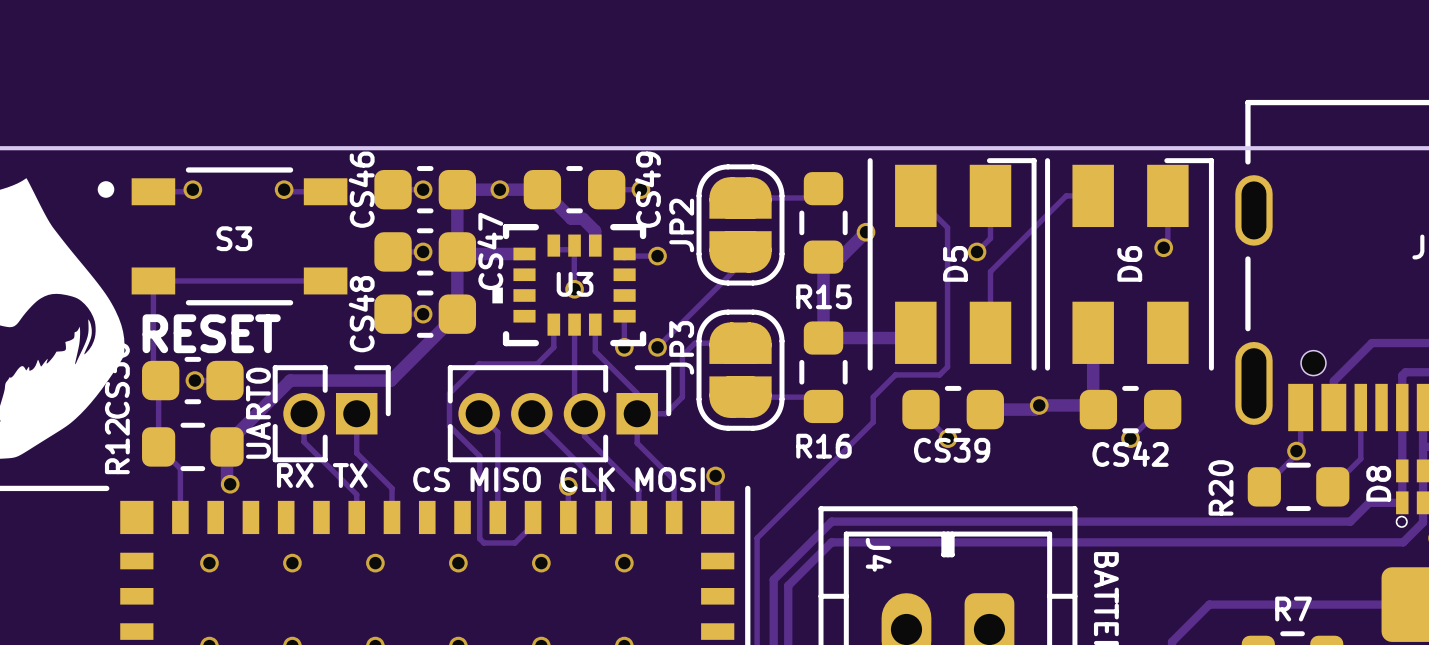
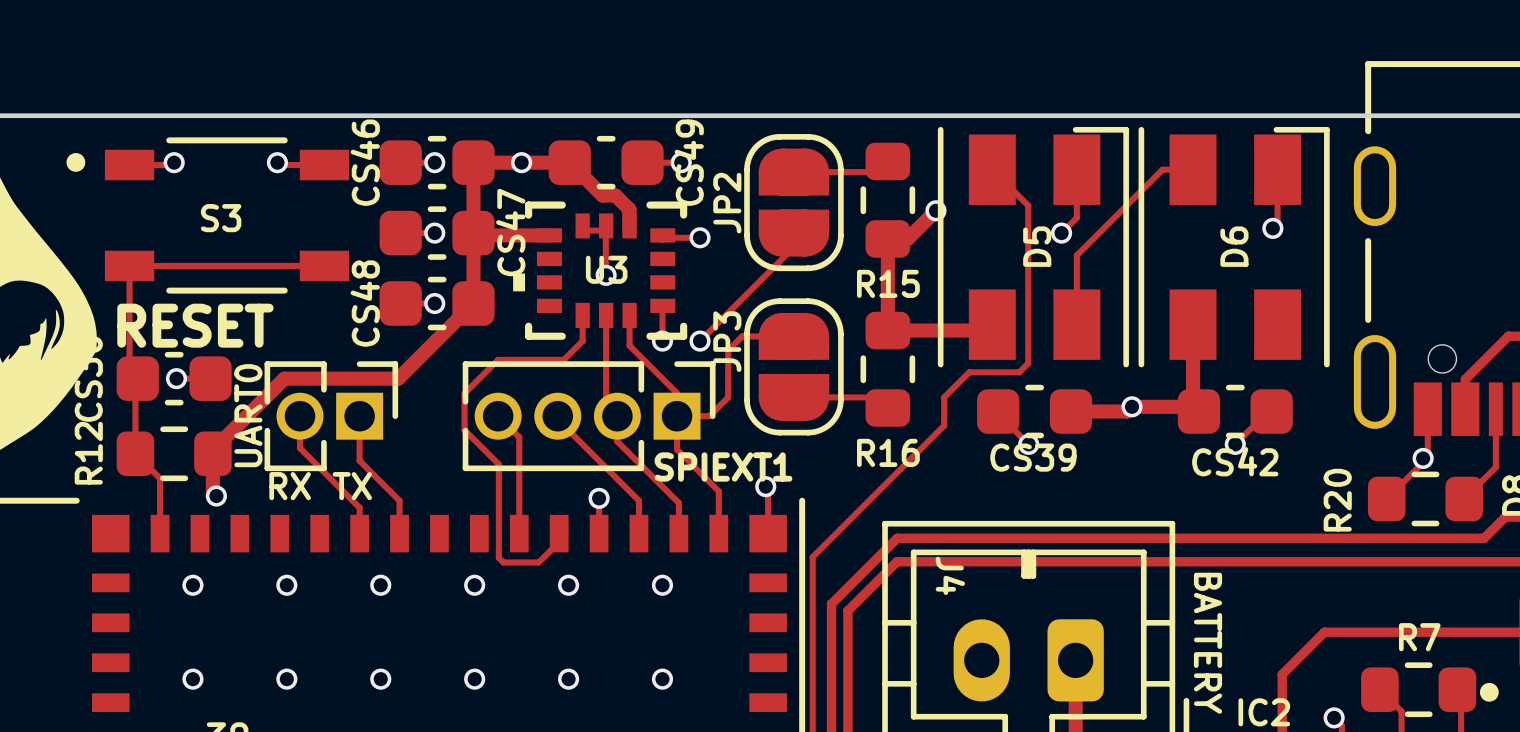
SPIEXT1 name: none -> SPIEXT1 (723, 466)
text: CS MISO CLK MOSI (559, 479) -> none

